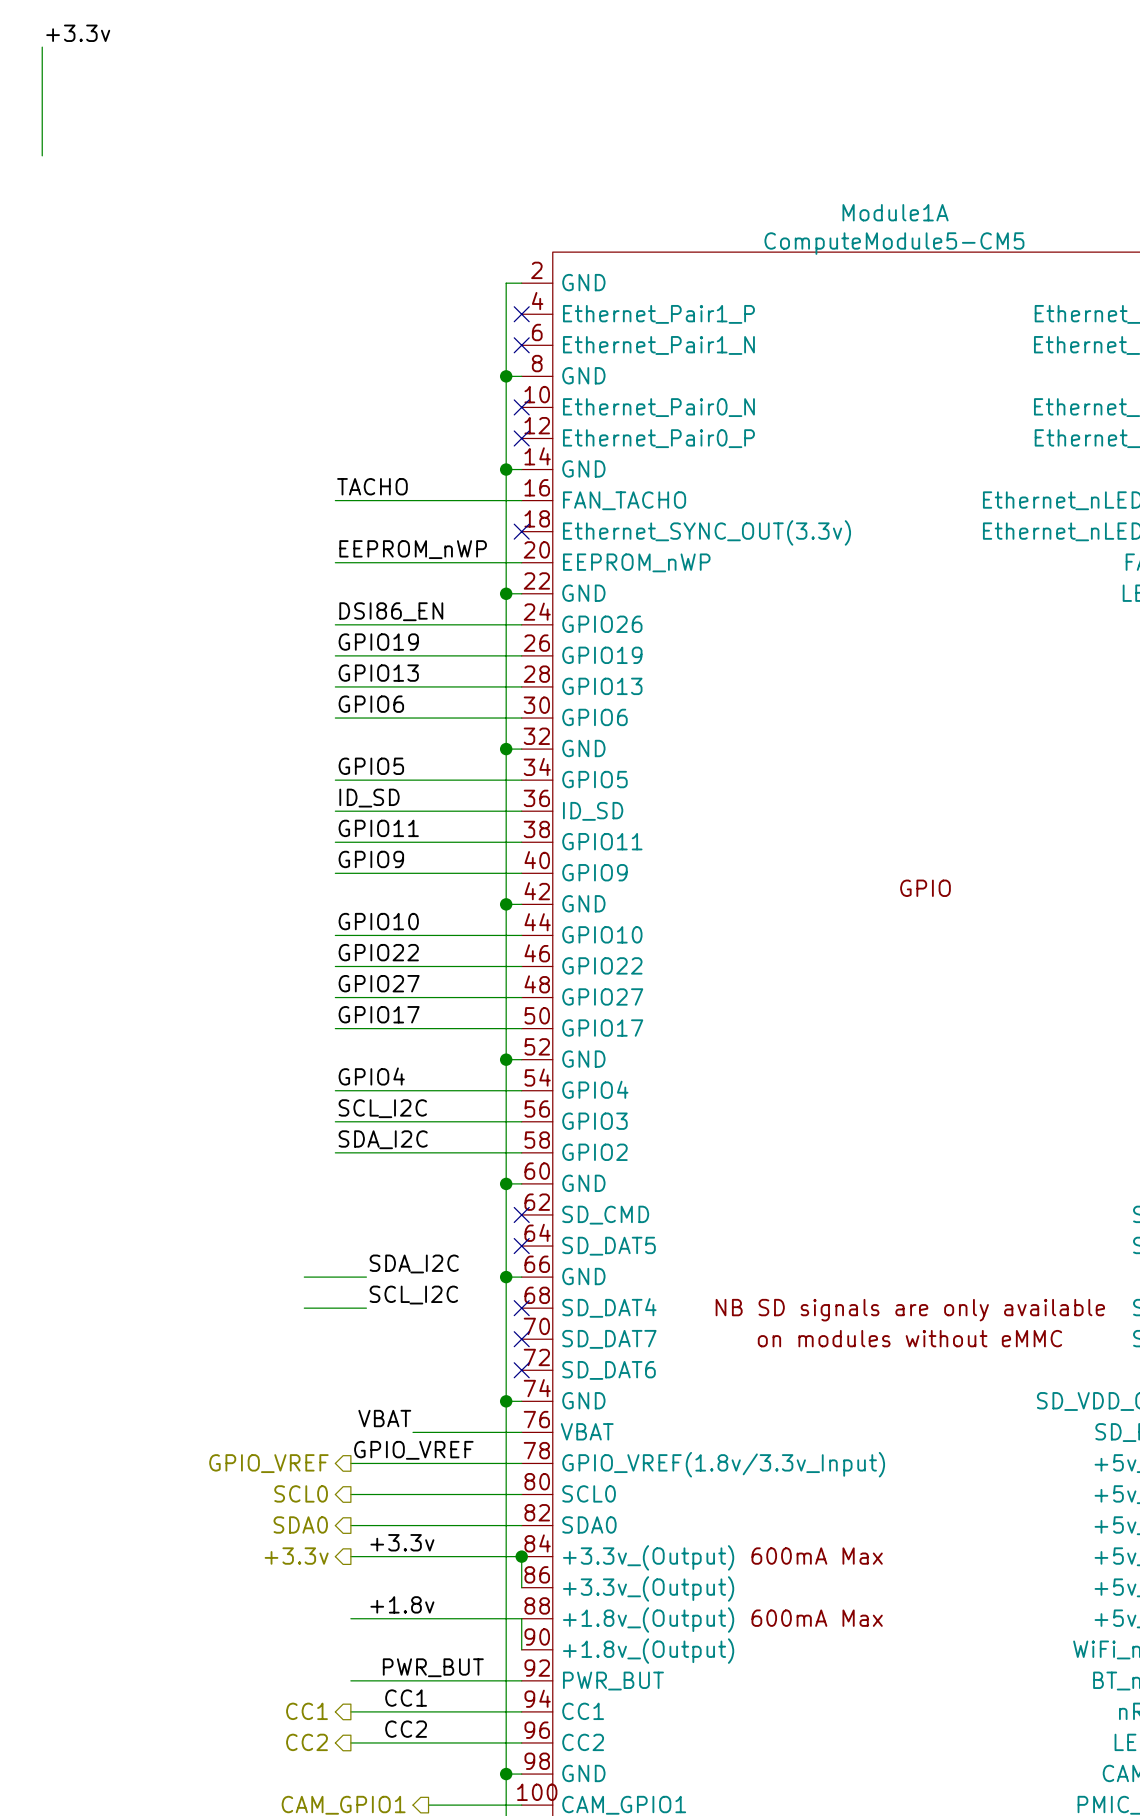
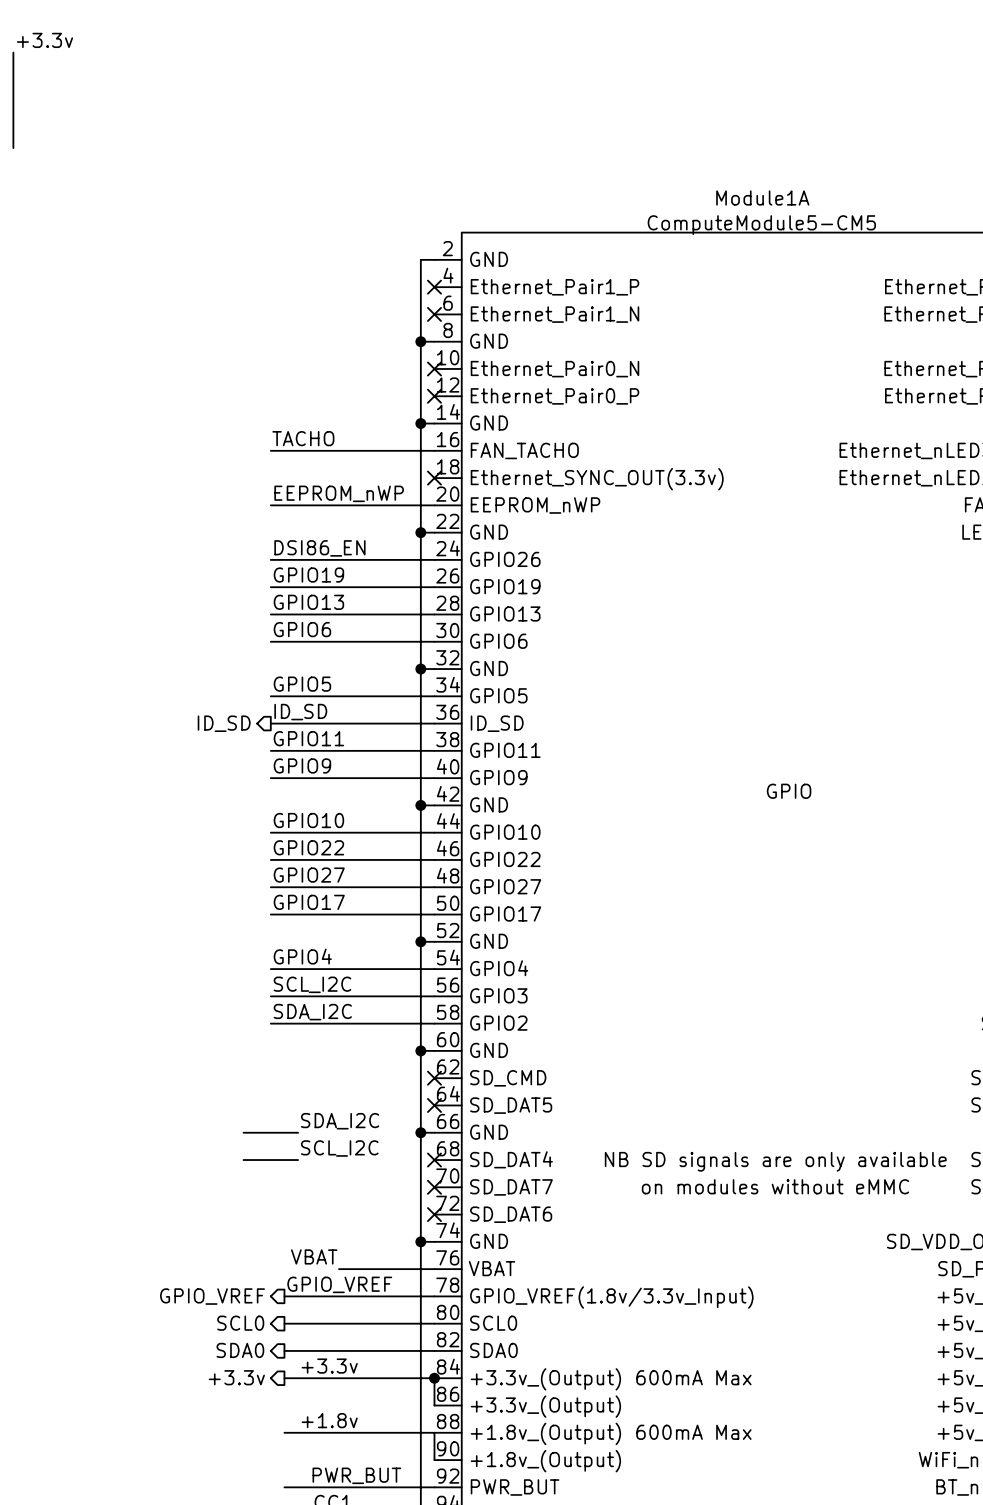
hierarchical label: none -> ID_SD (224, 723)

